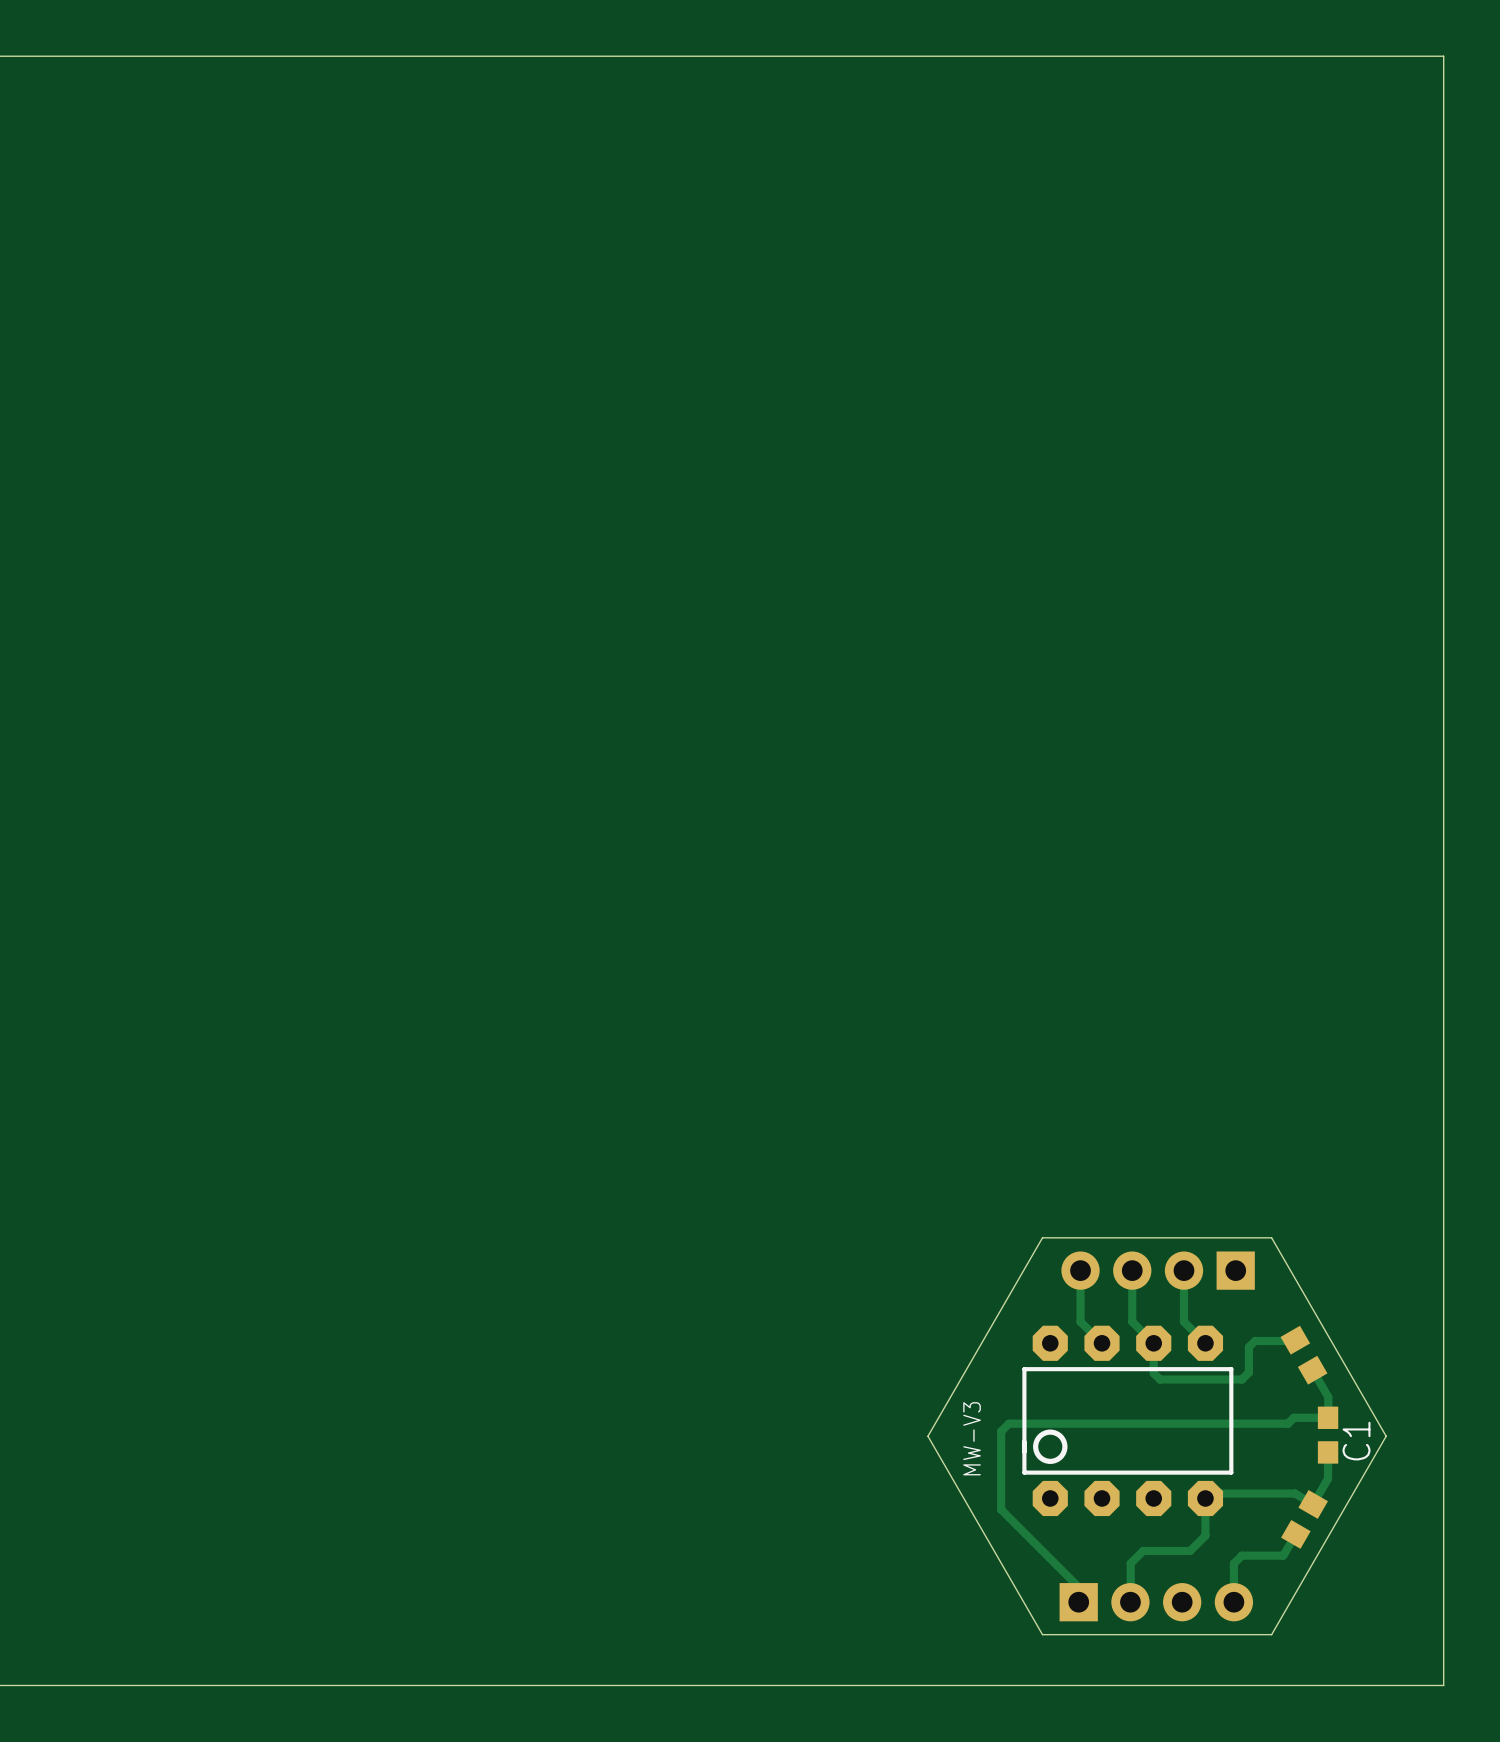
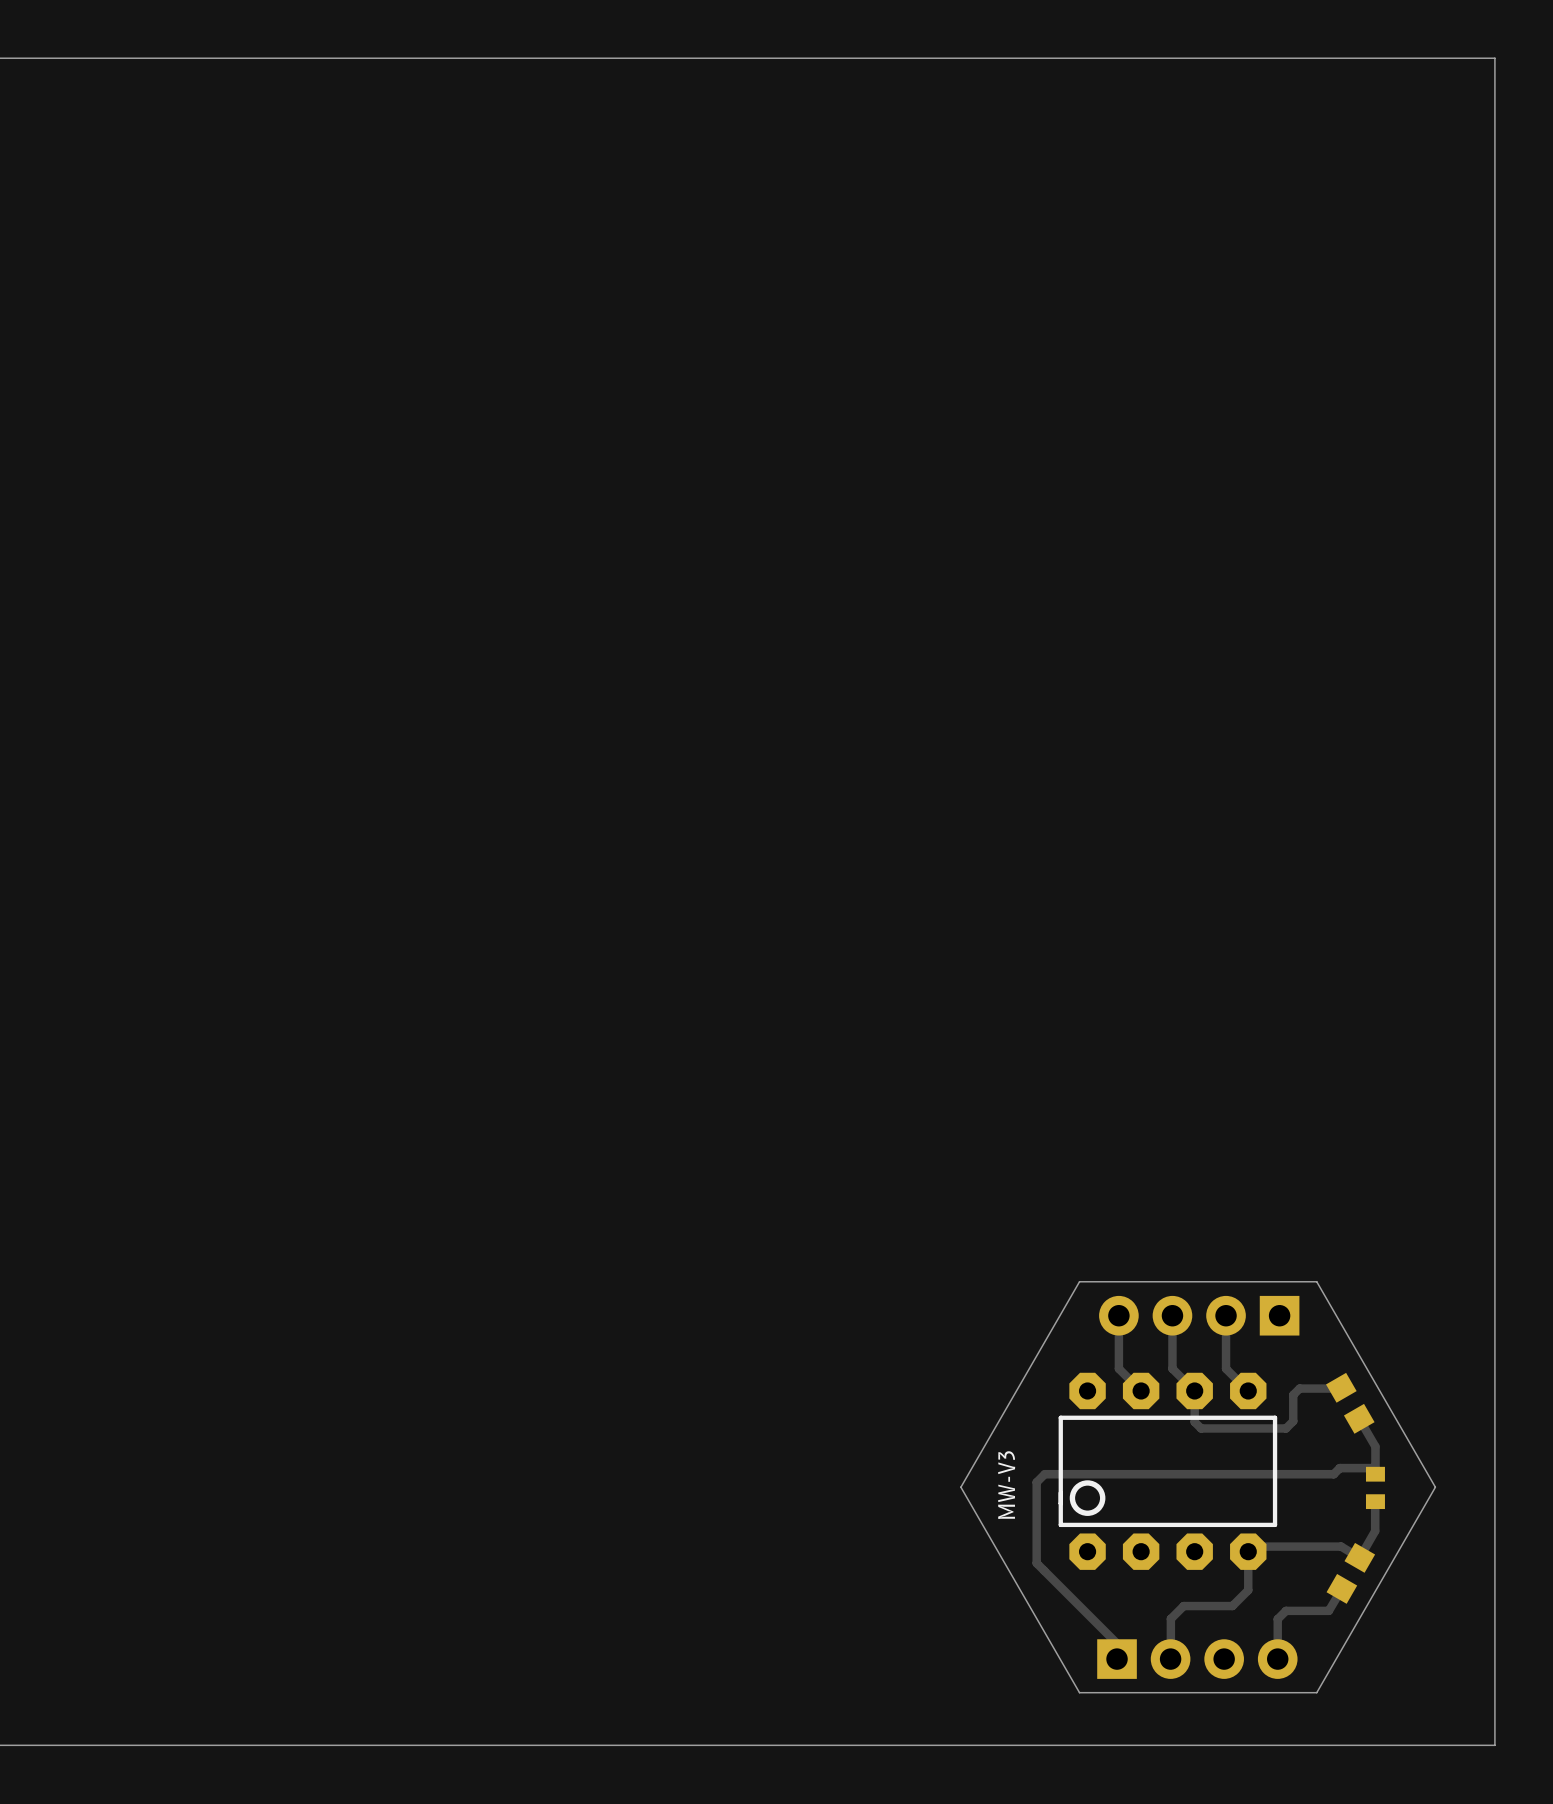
C1: (1328, 1435) -> none
part: none -> (1375, 1487)

